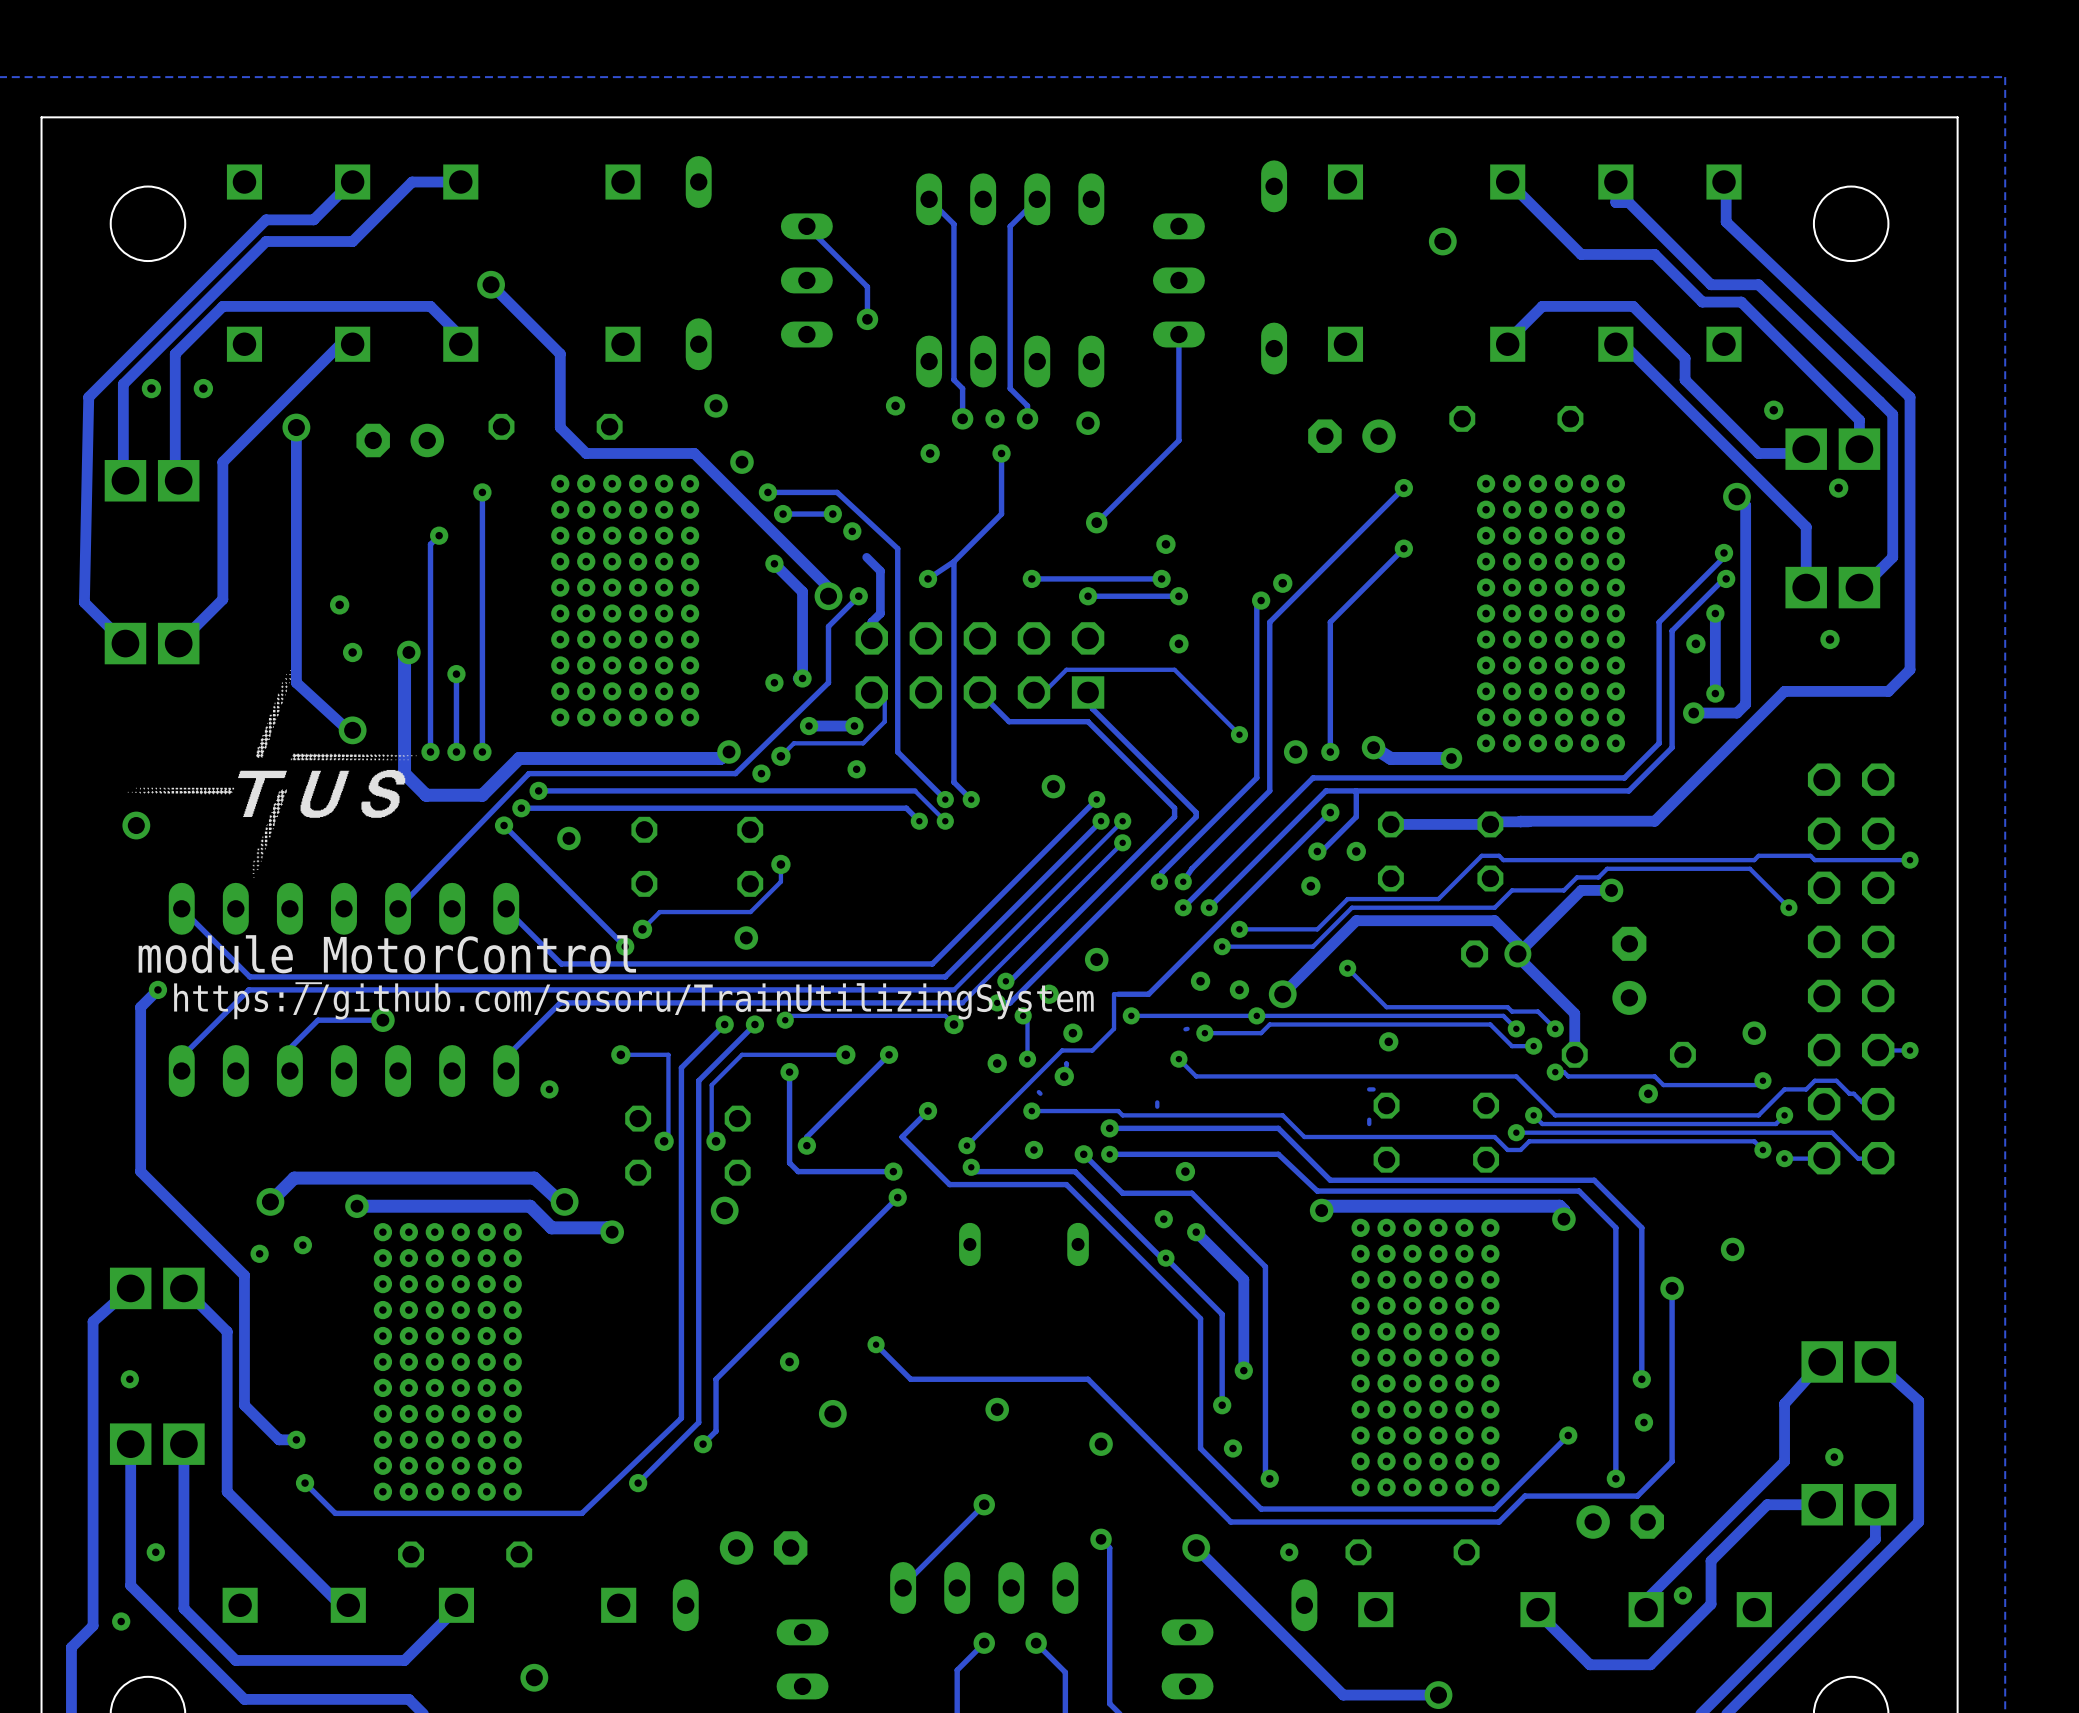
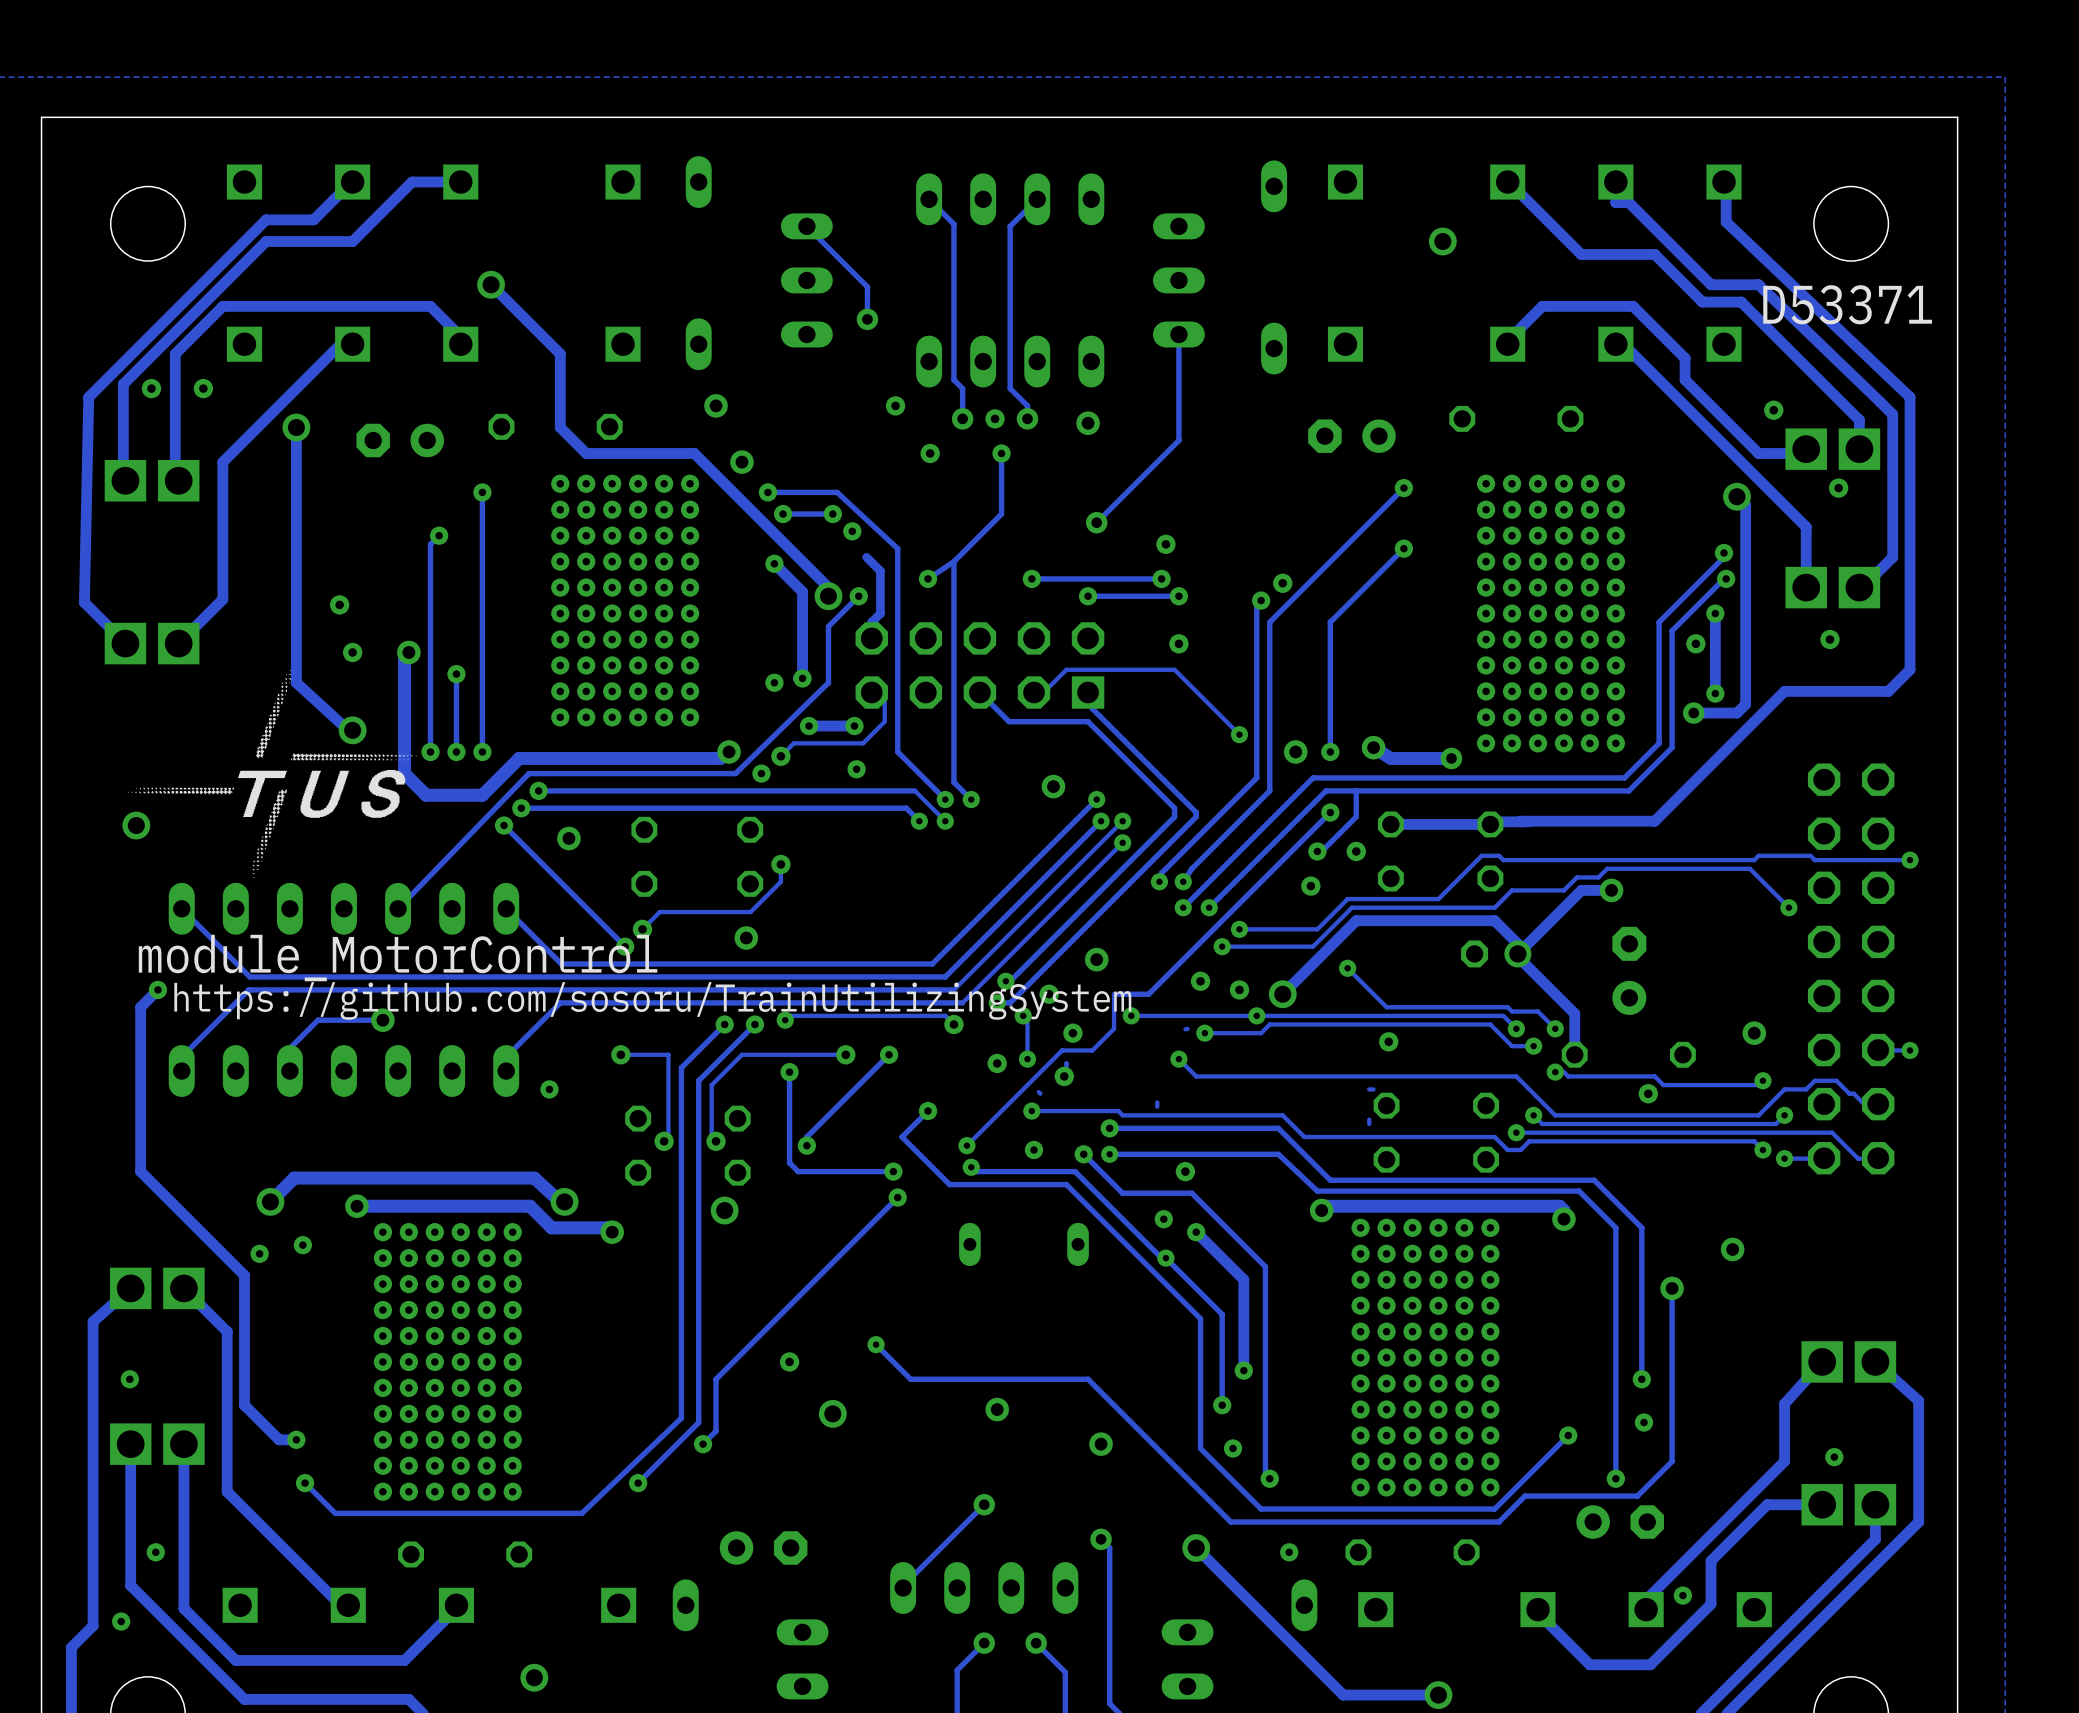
text: none -> D53371 (1847, 304)

